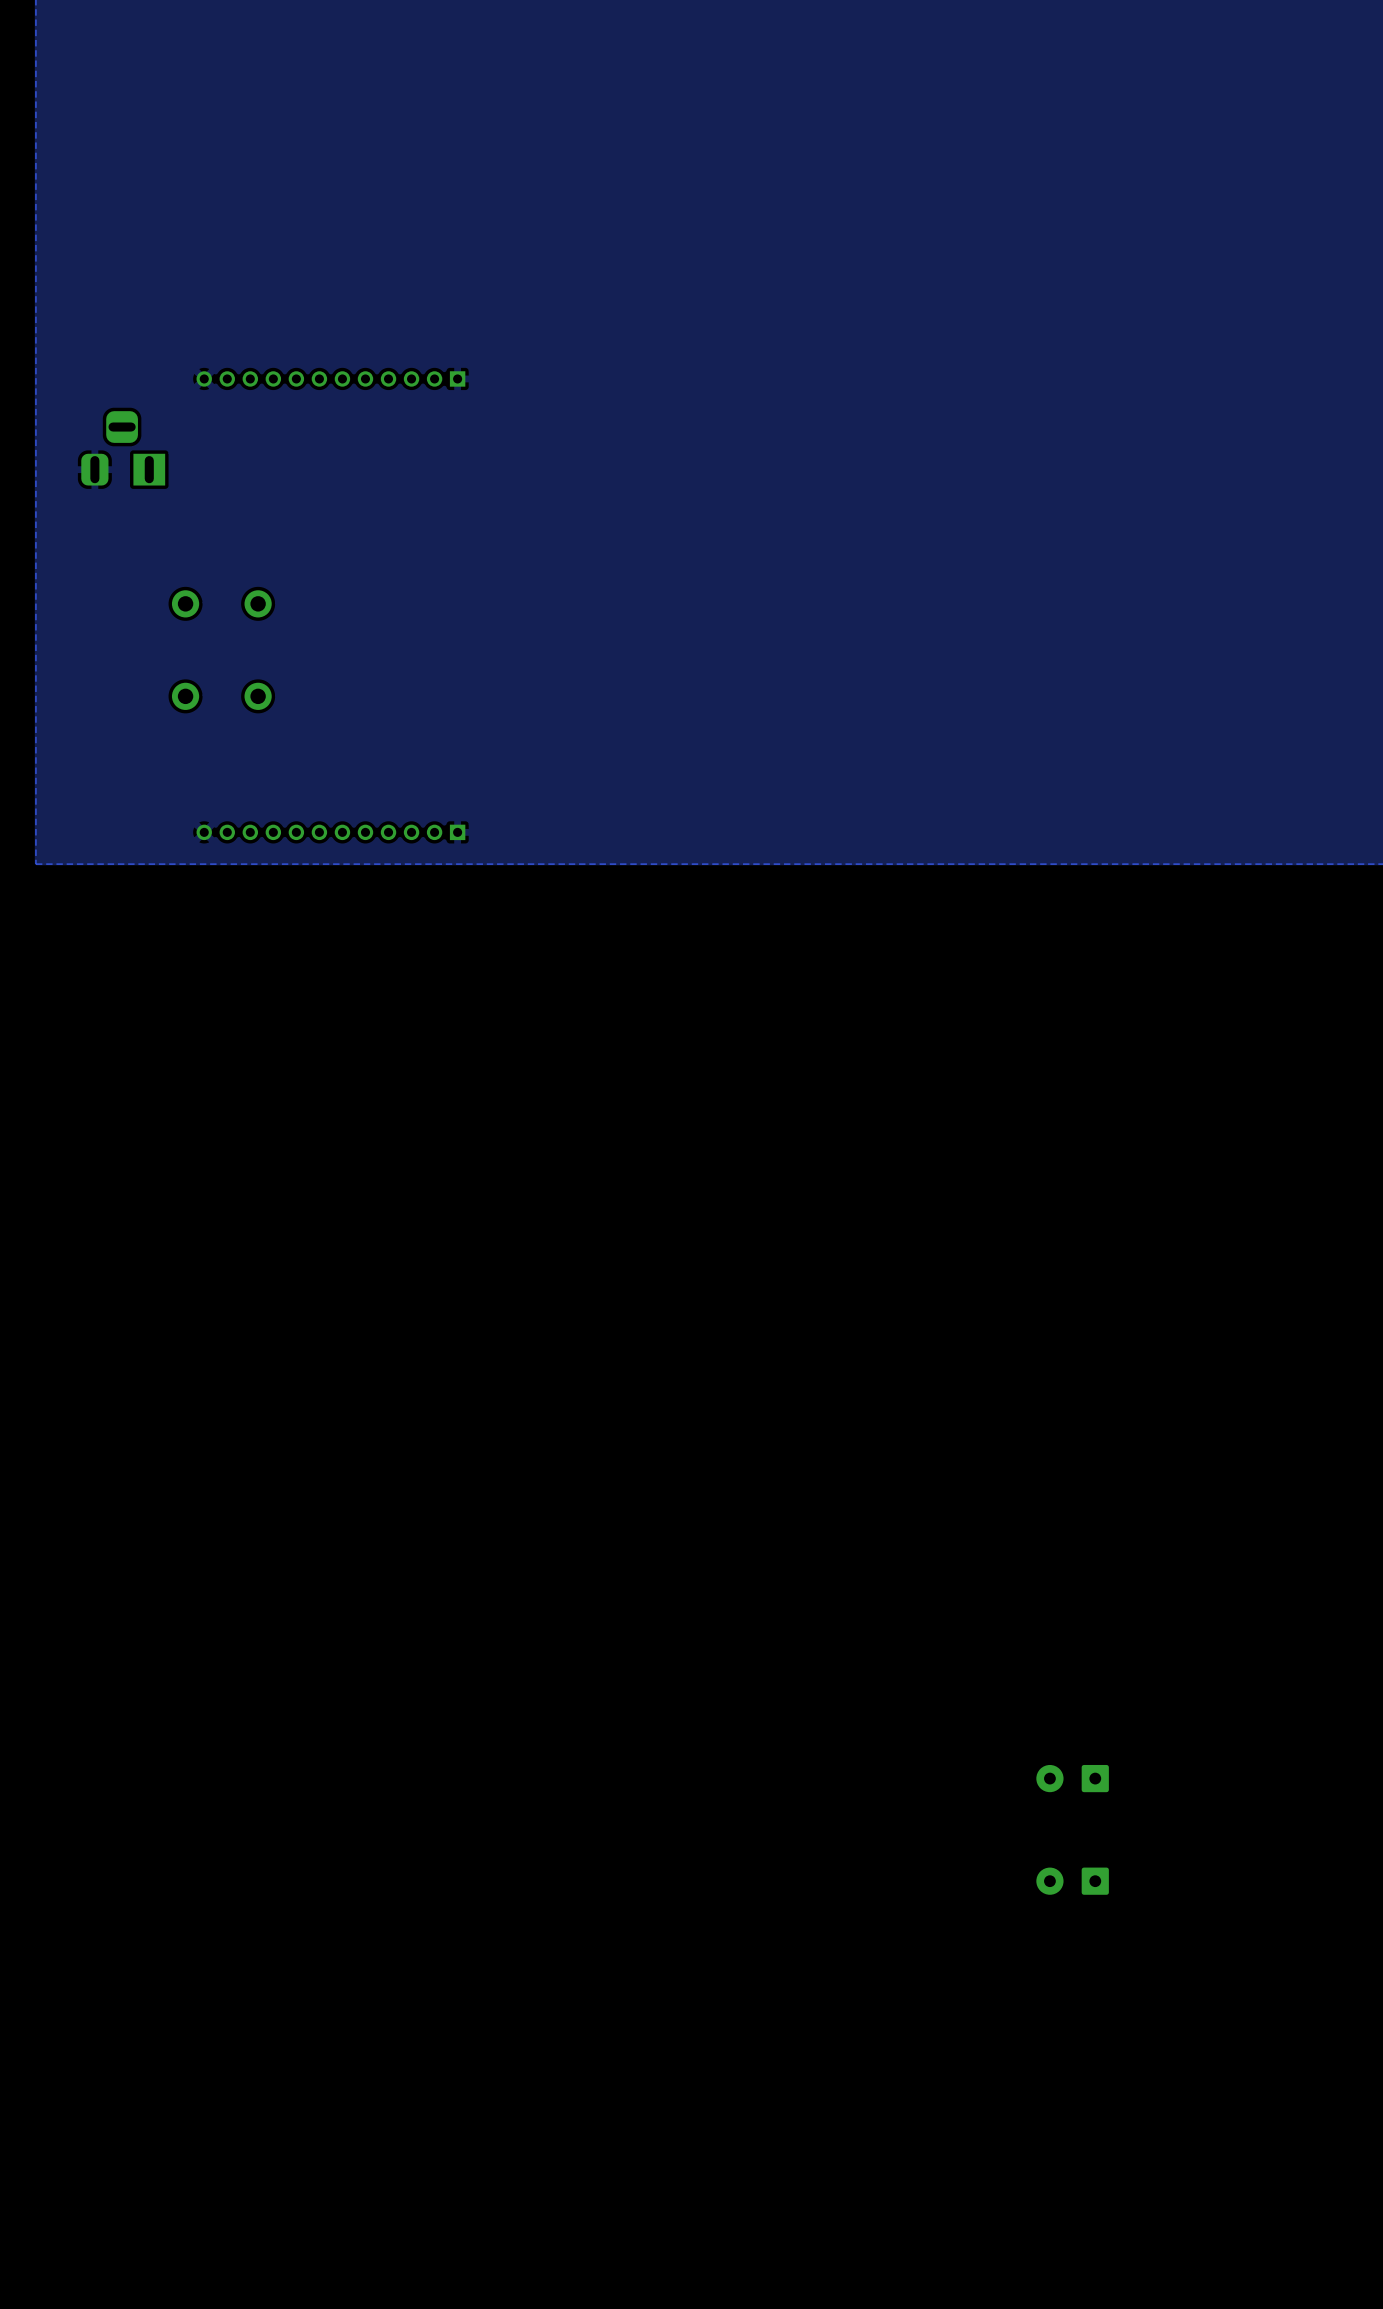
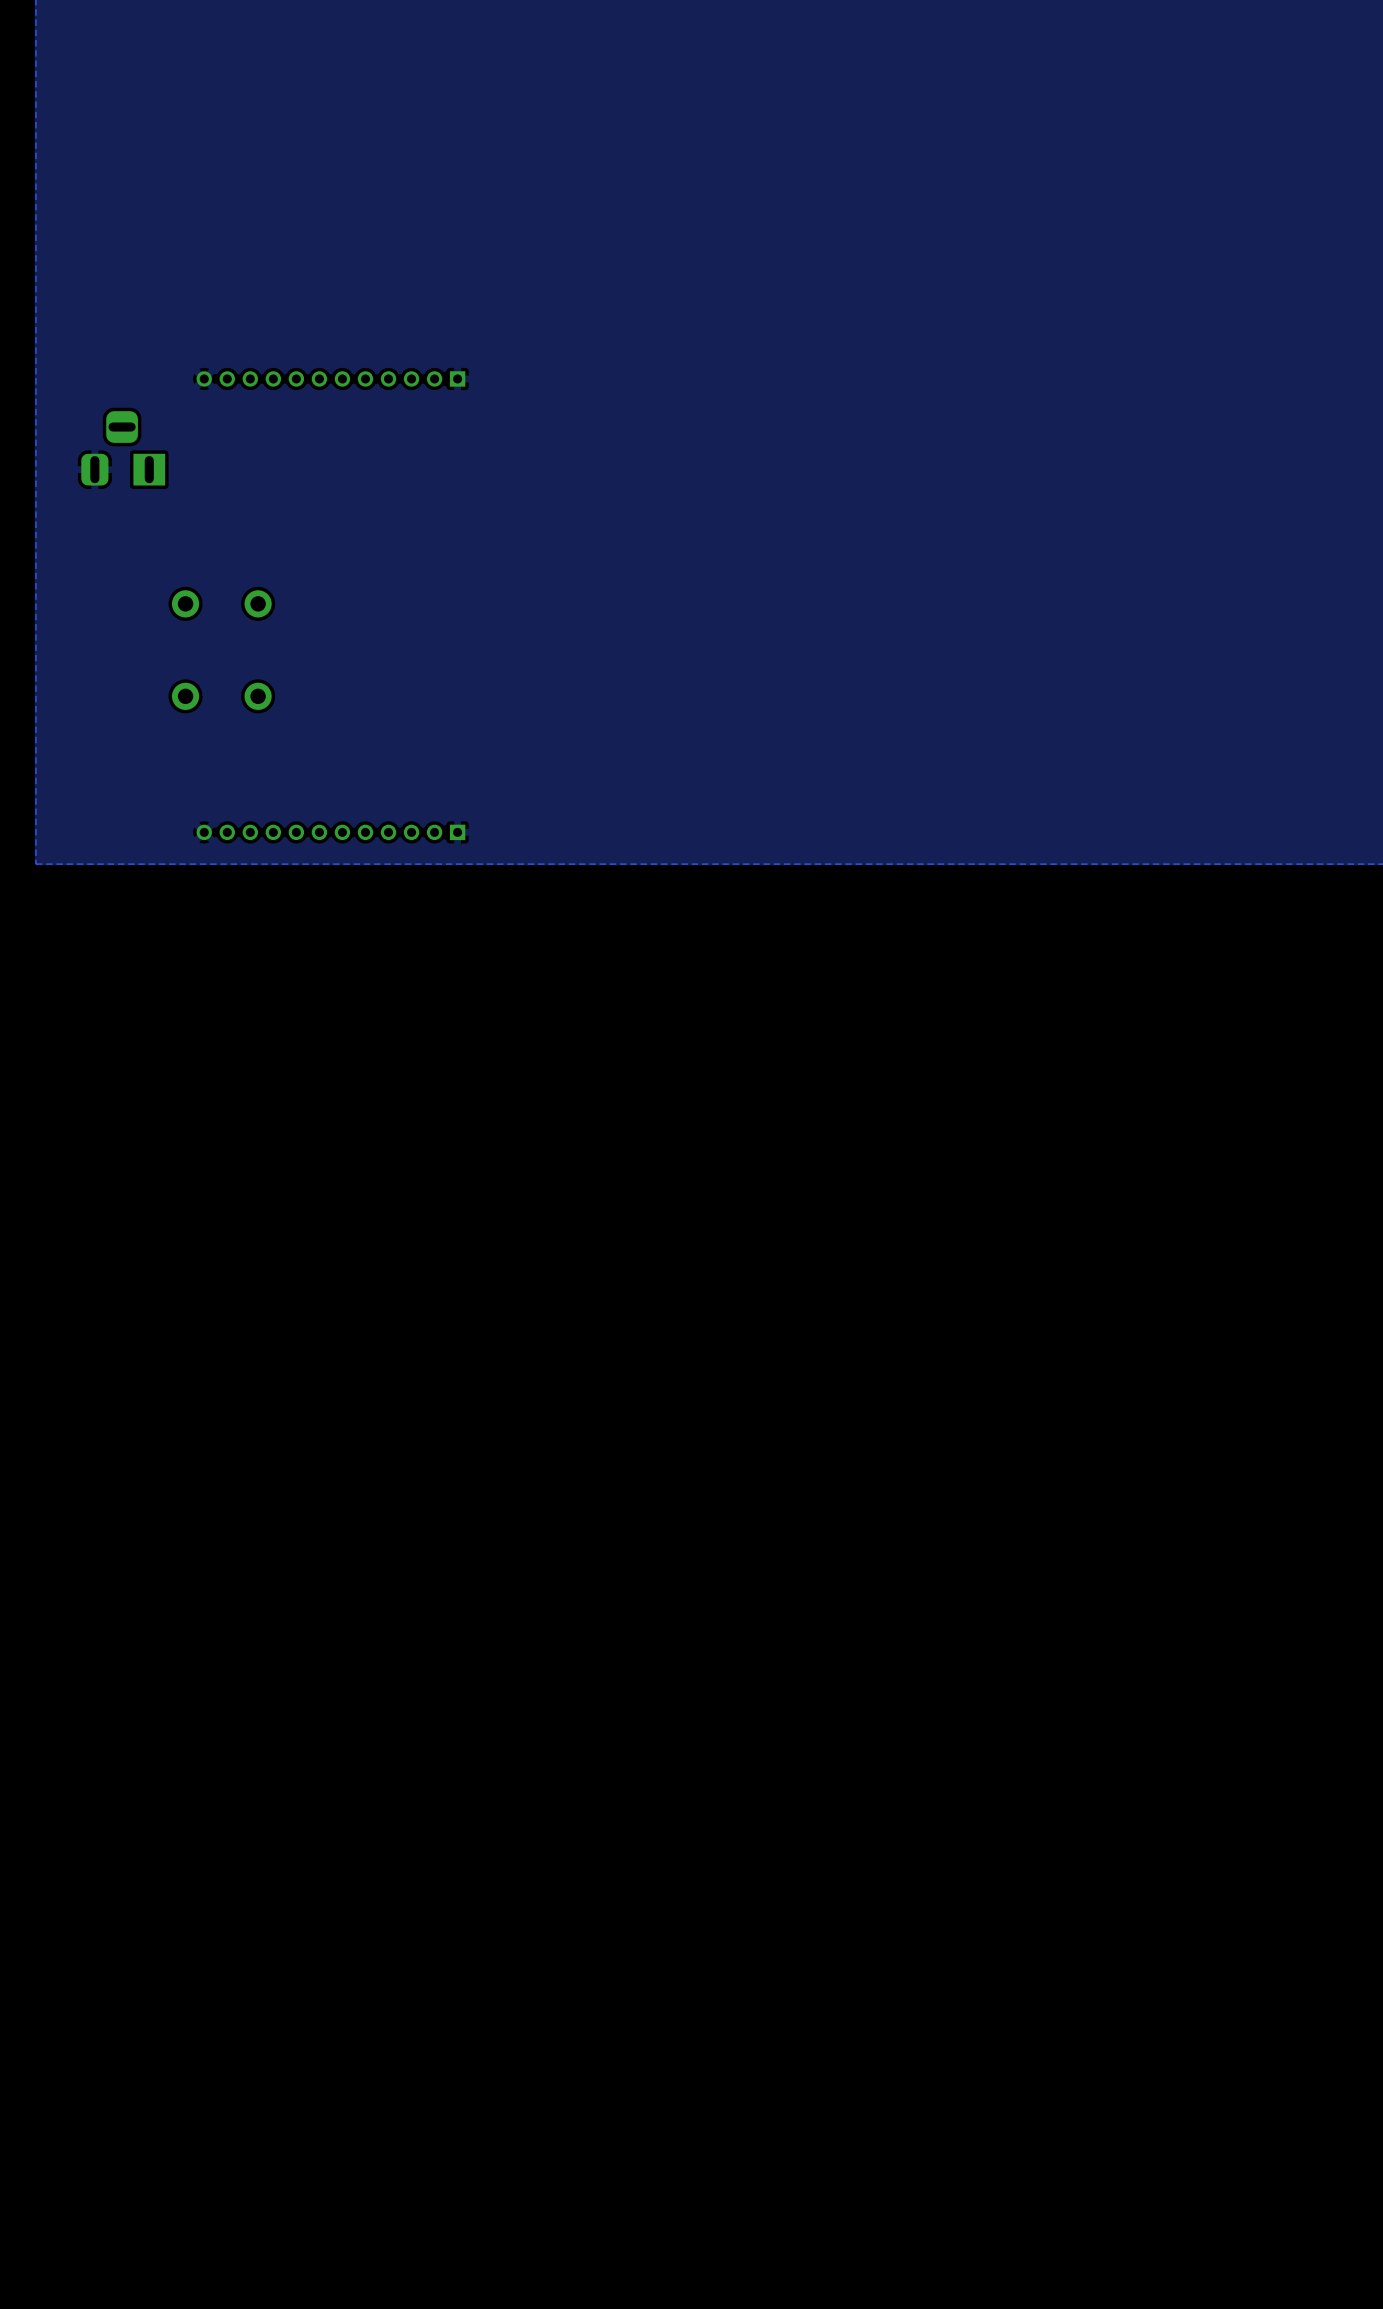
part: (1072, 1778) -> none
part: (1072, 1881) -> none

